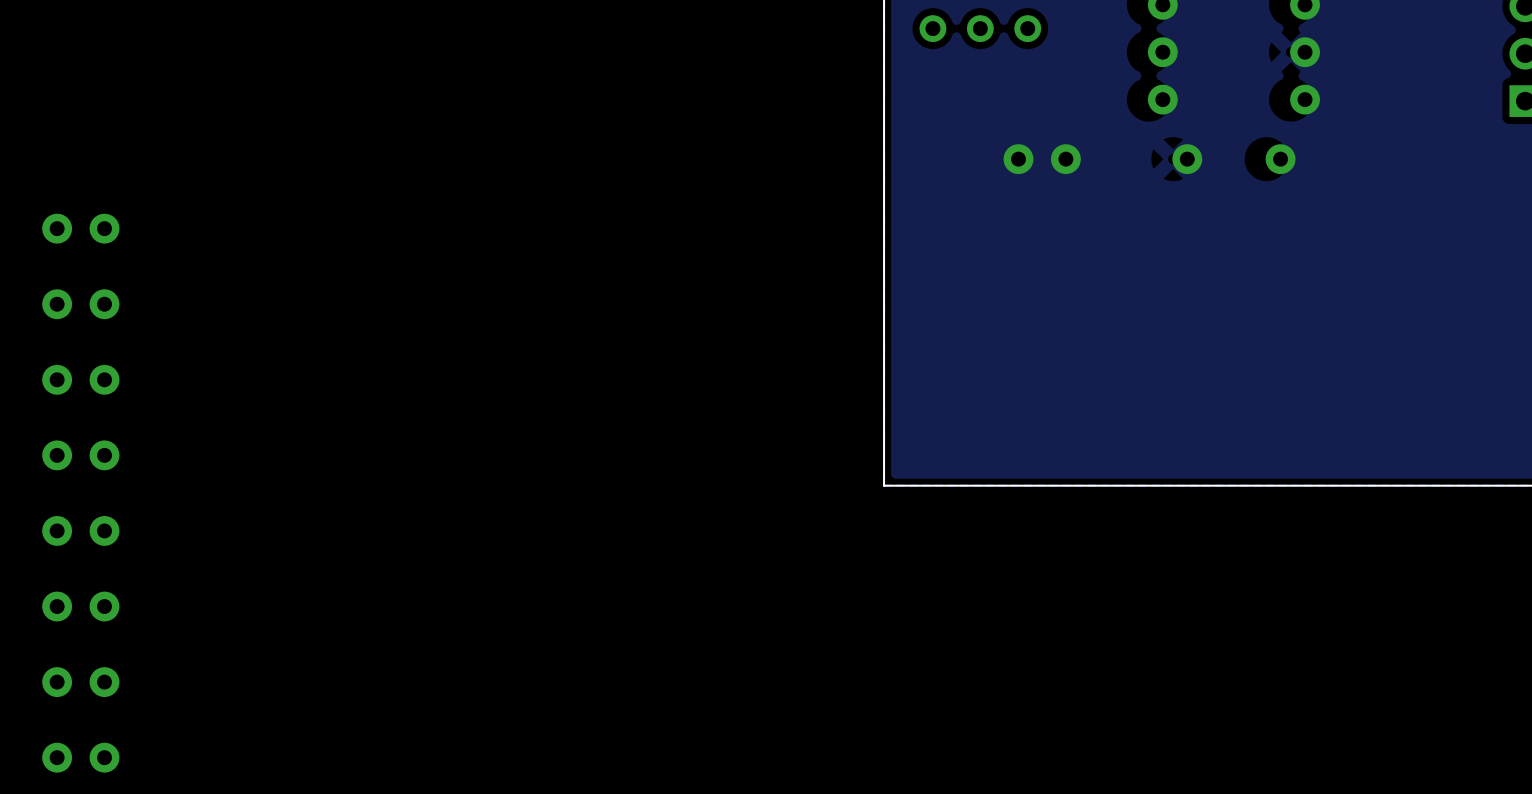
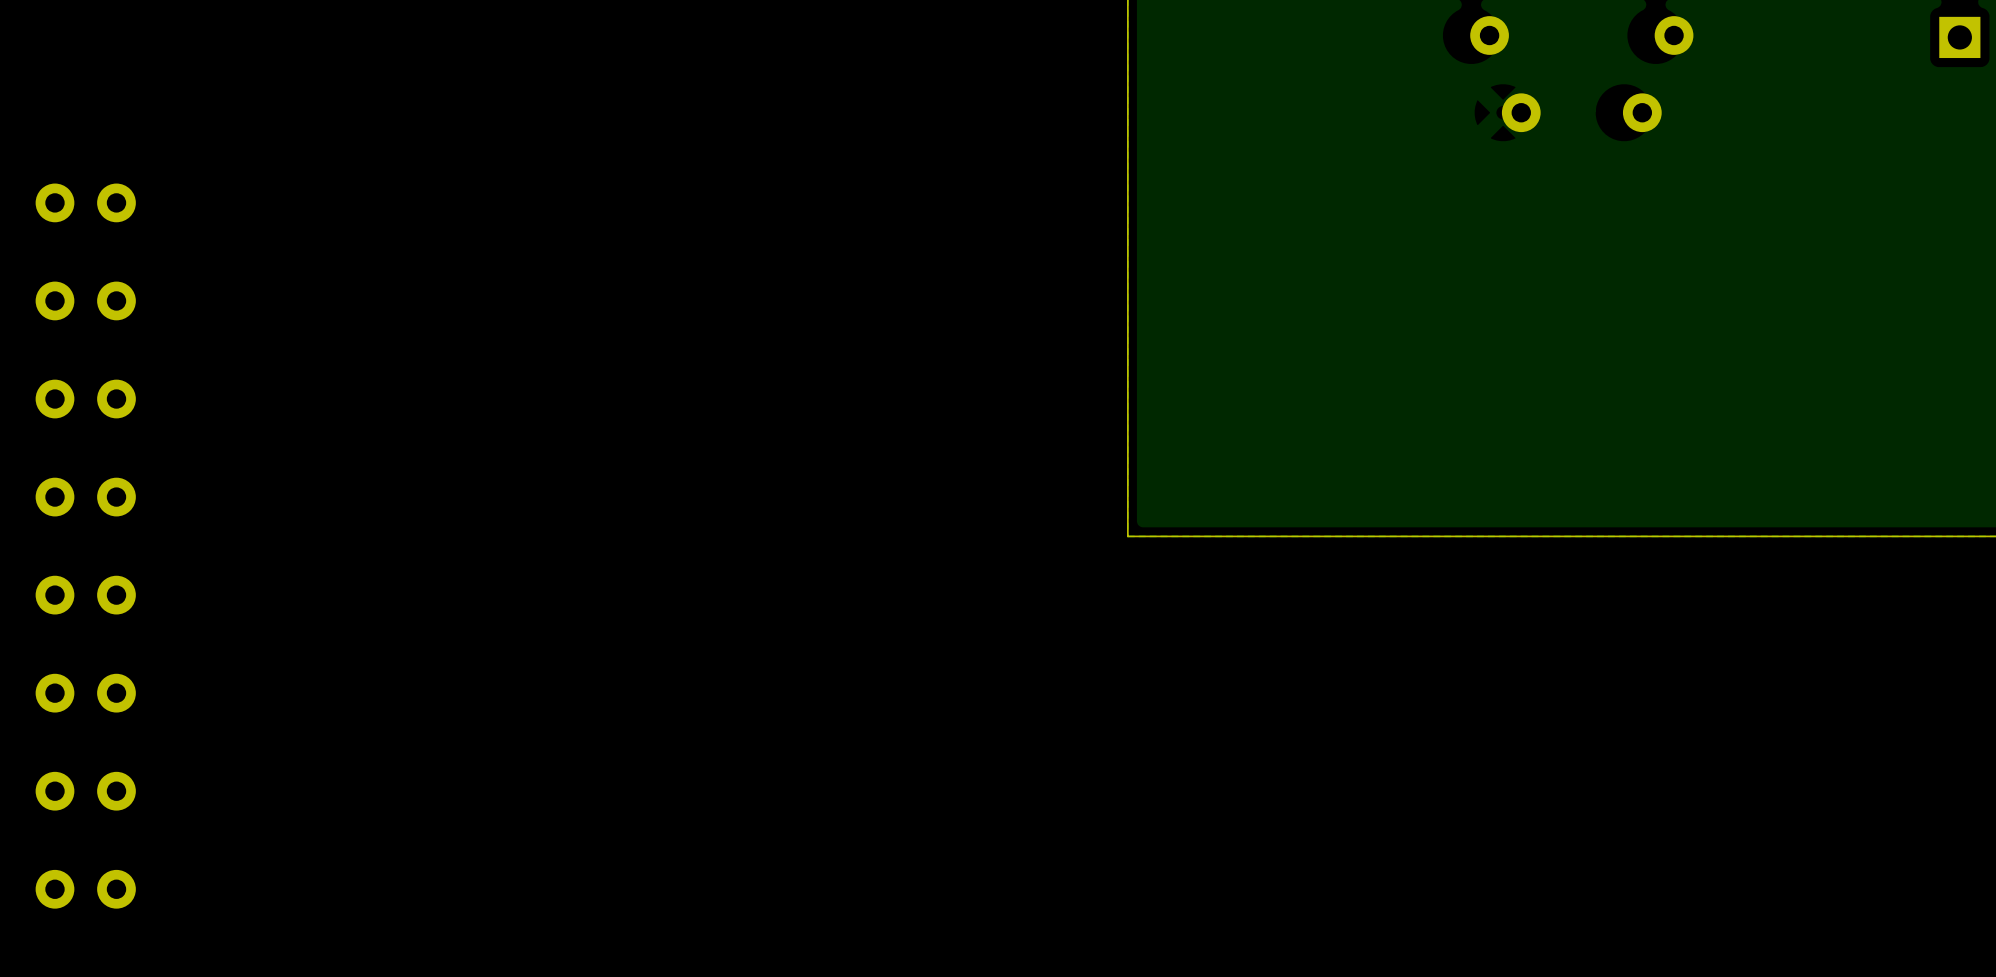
part: (1042, 159) -> none

